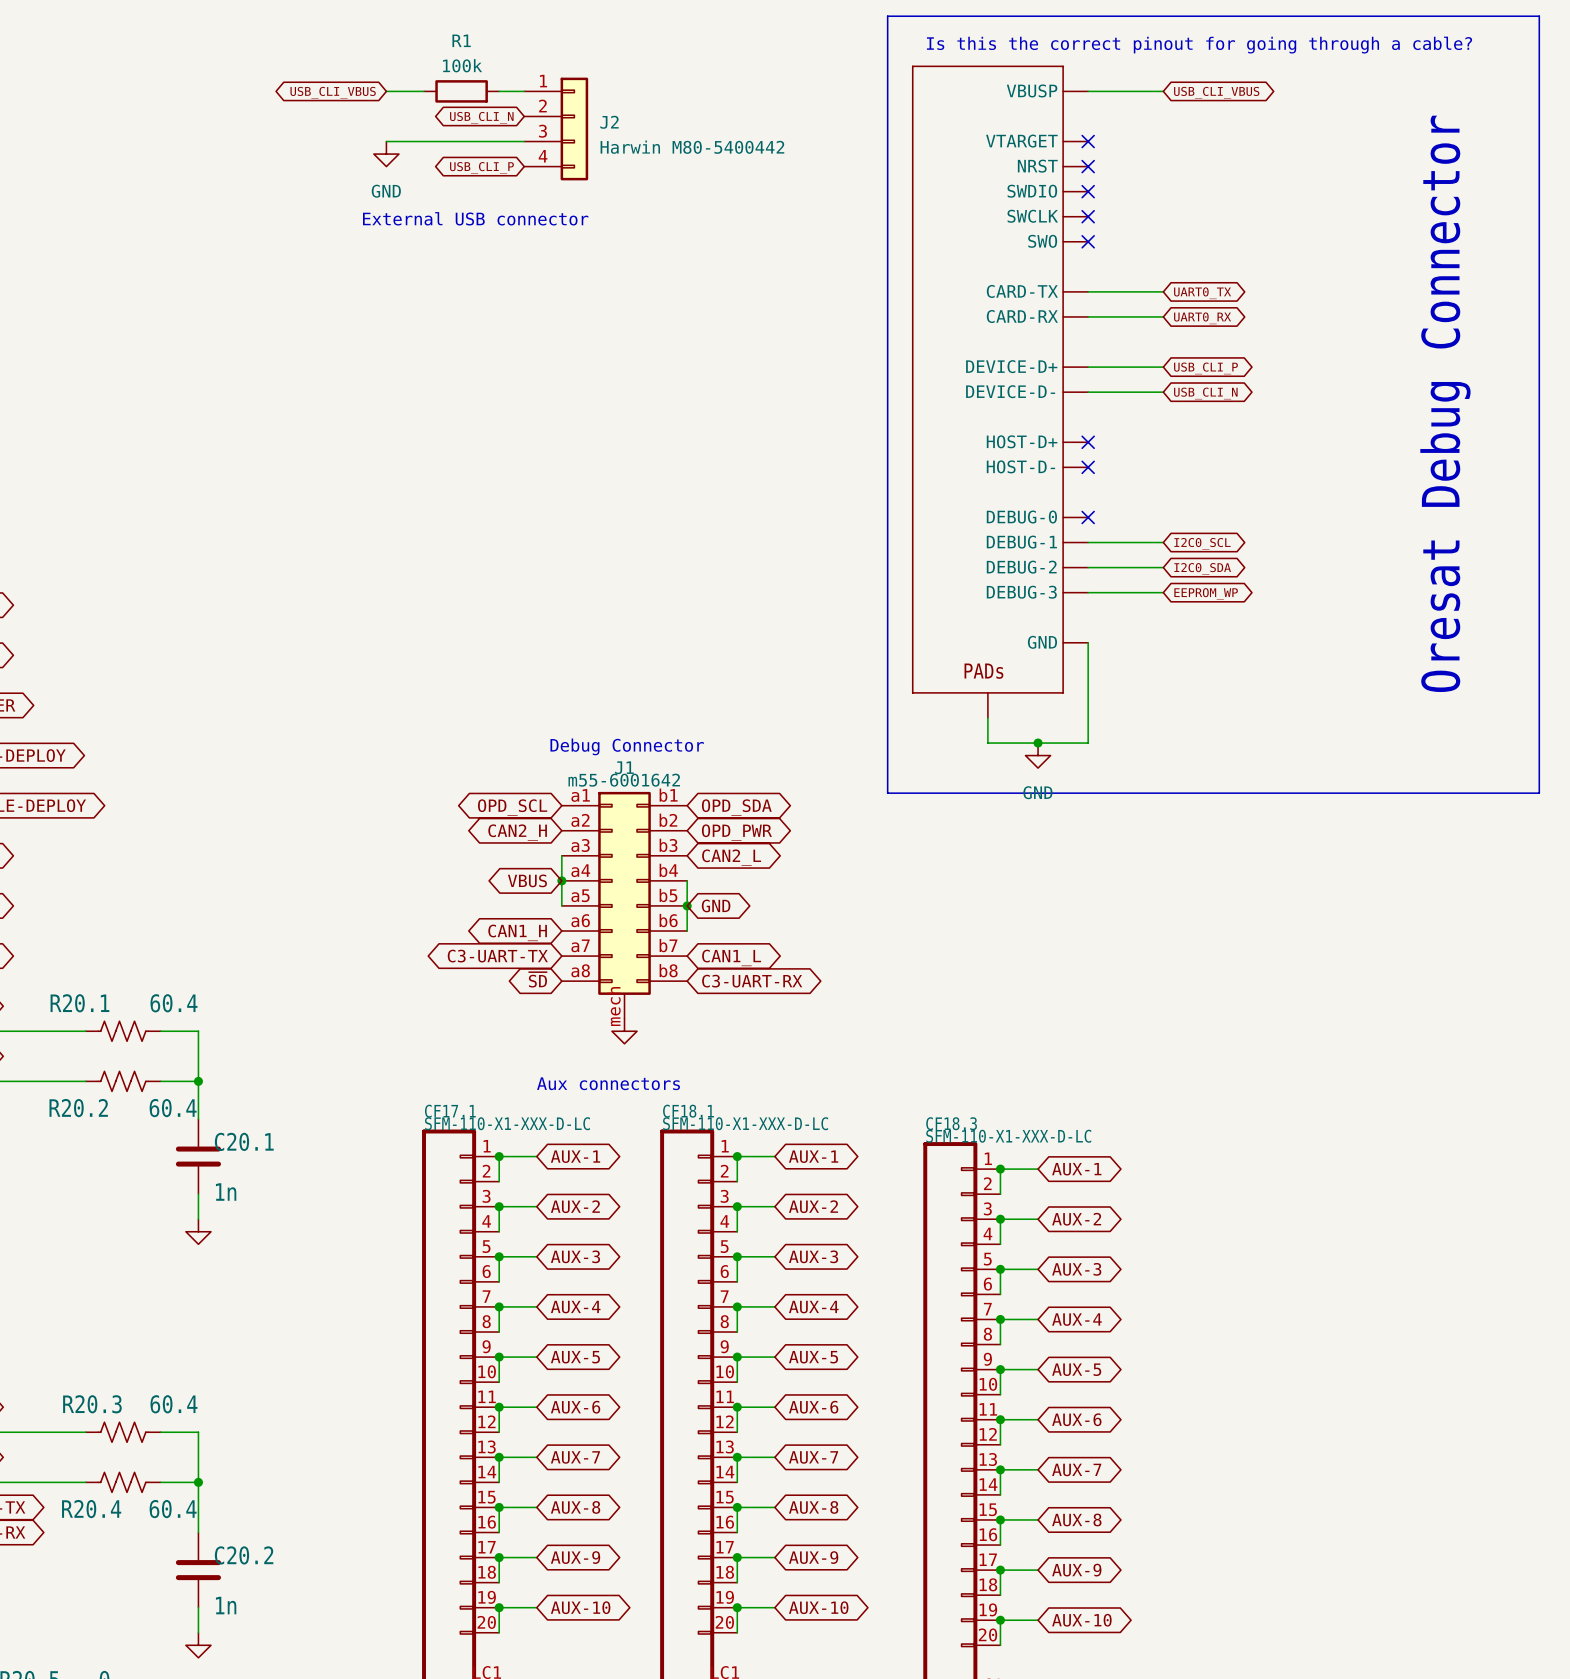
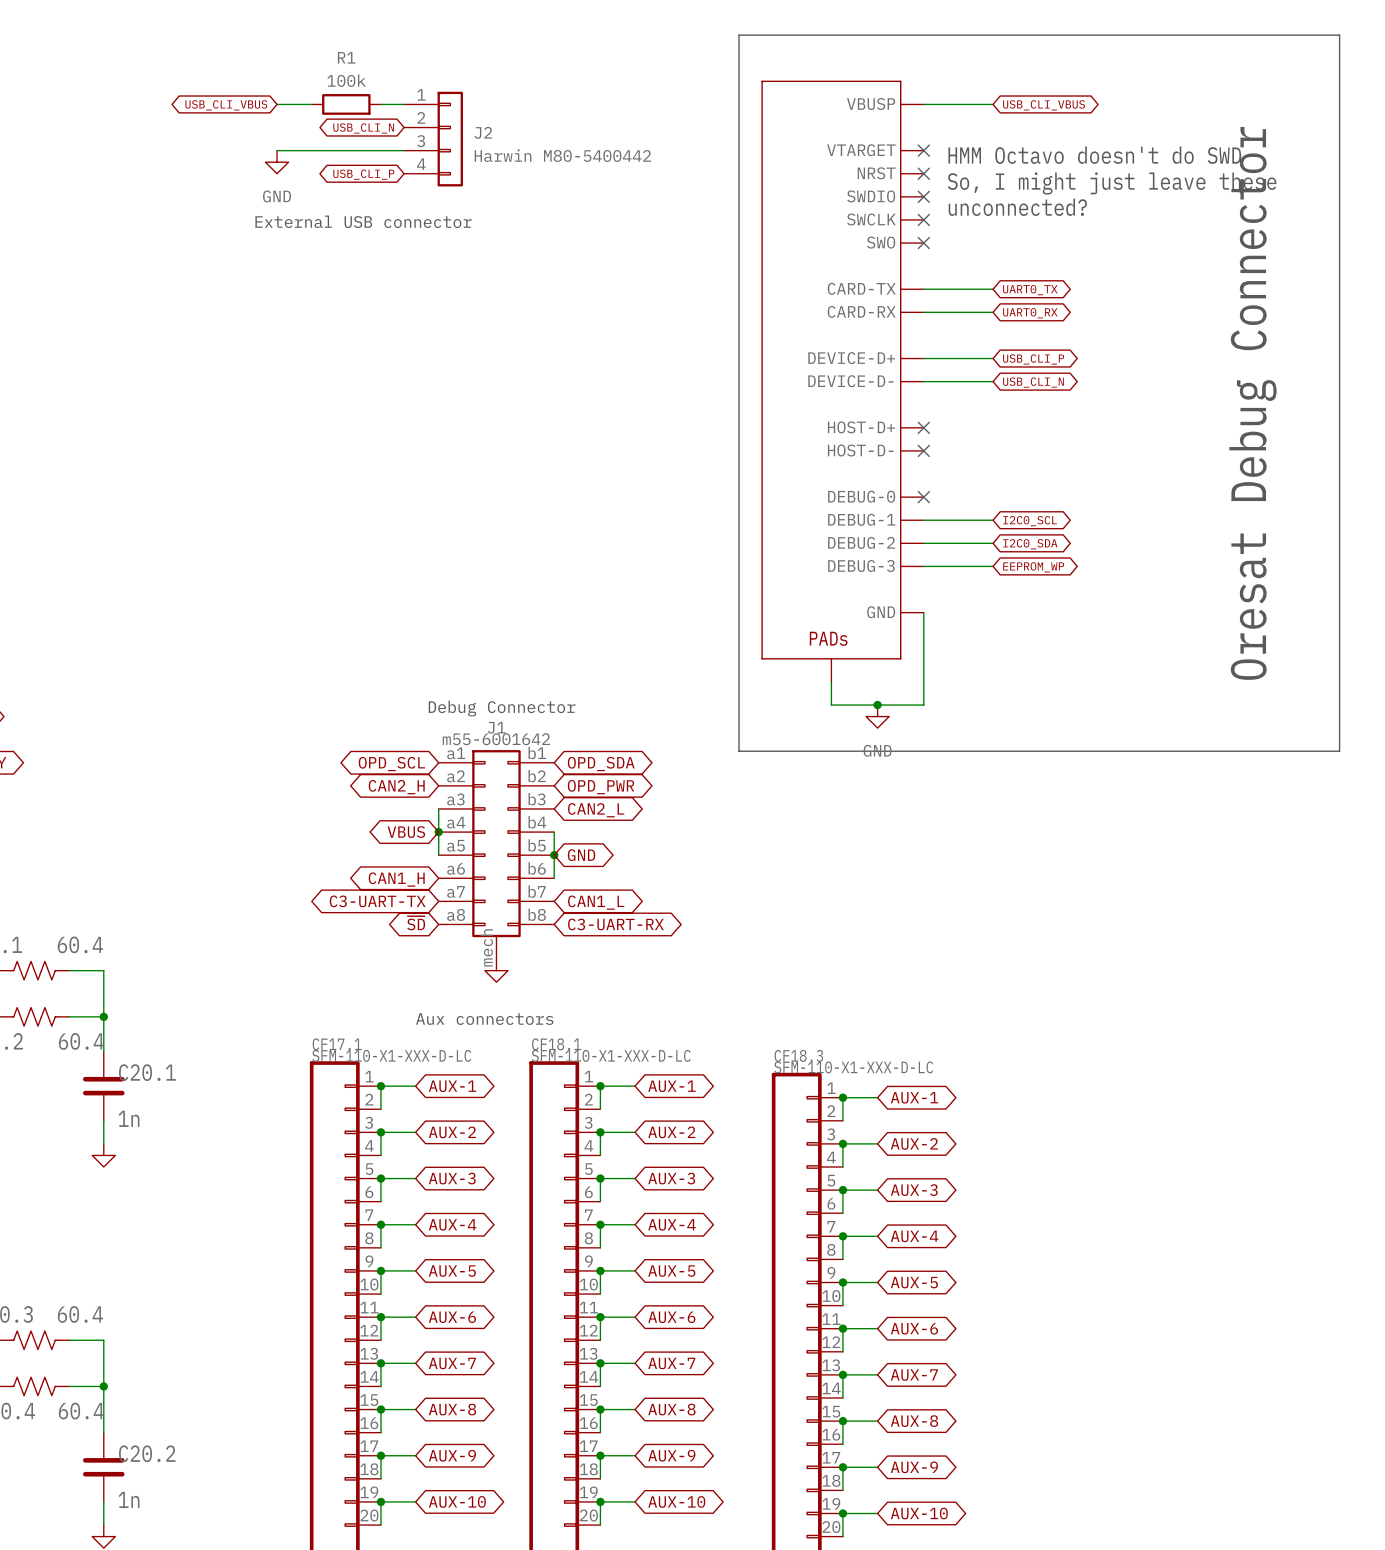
text: Is this the correct pinout for going through a cable? (1199, 45) -> none
text: none -> HMM Octavo doesn't do SWD (1094, 155)
text: none -> So, I might just leave these (1112, 183)
text: none -> unconnected? (1017, 207)

